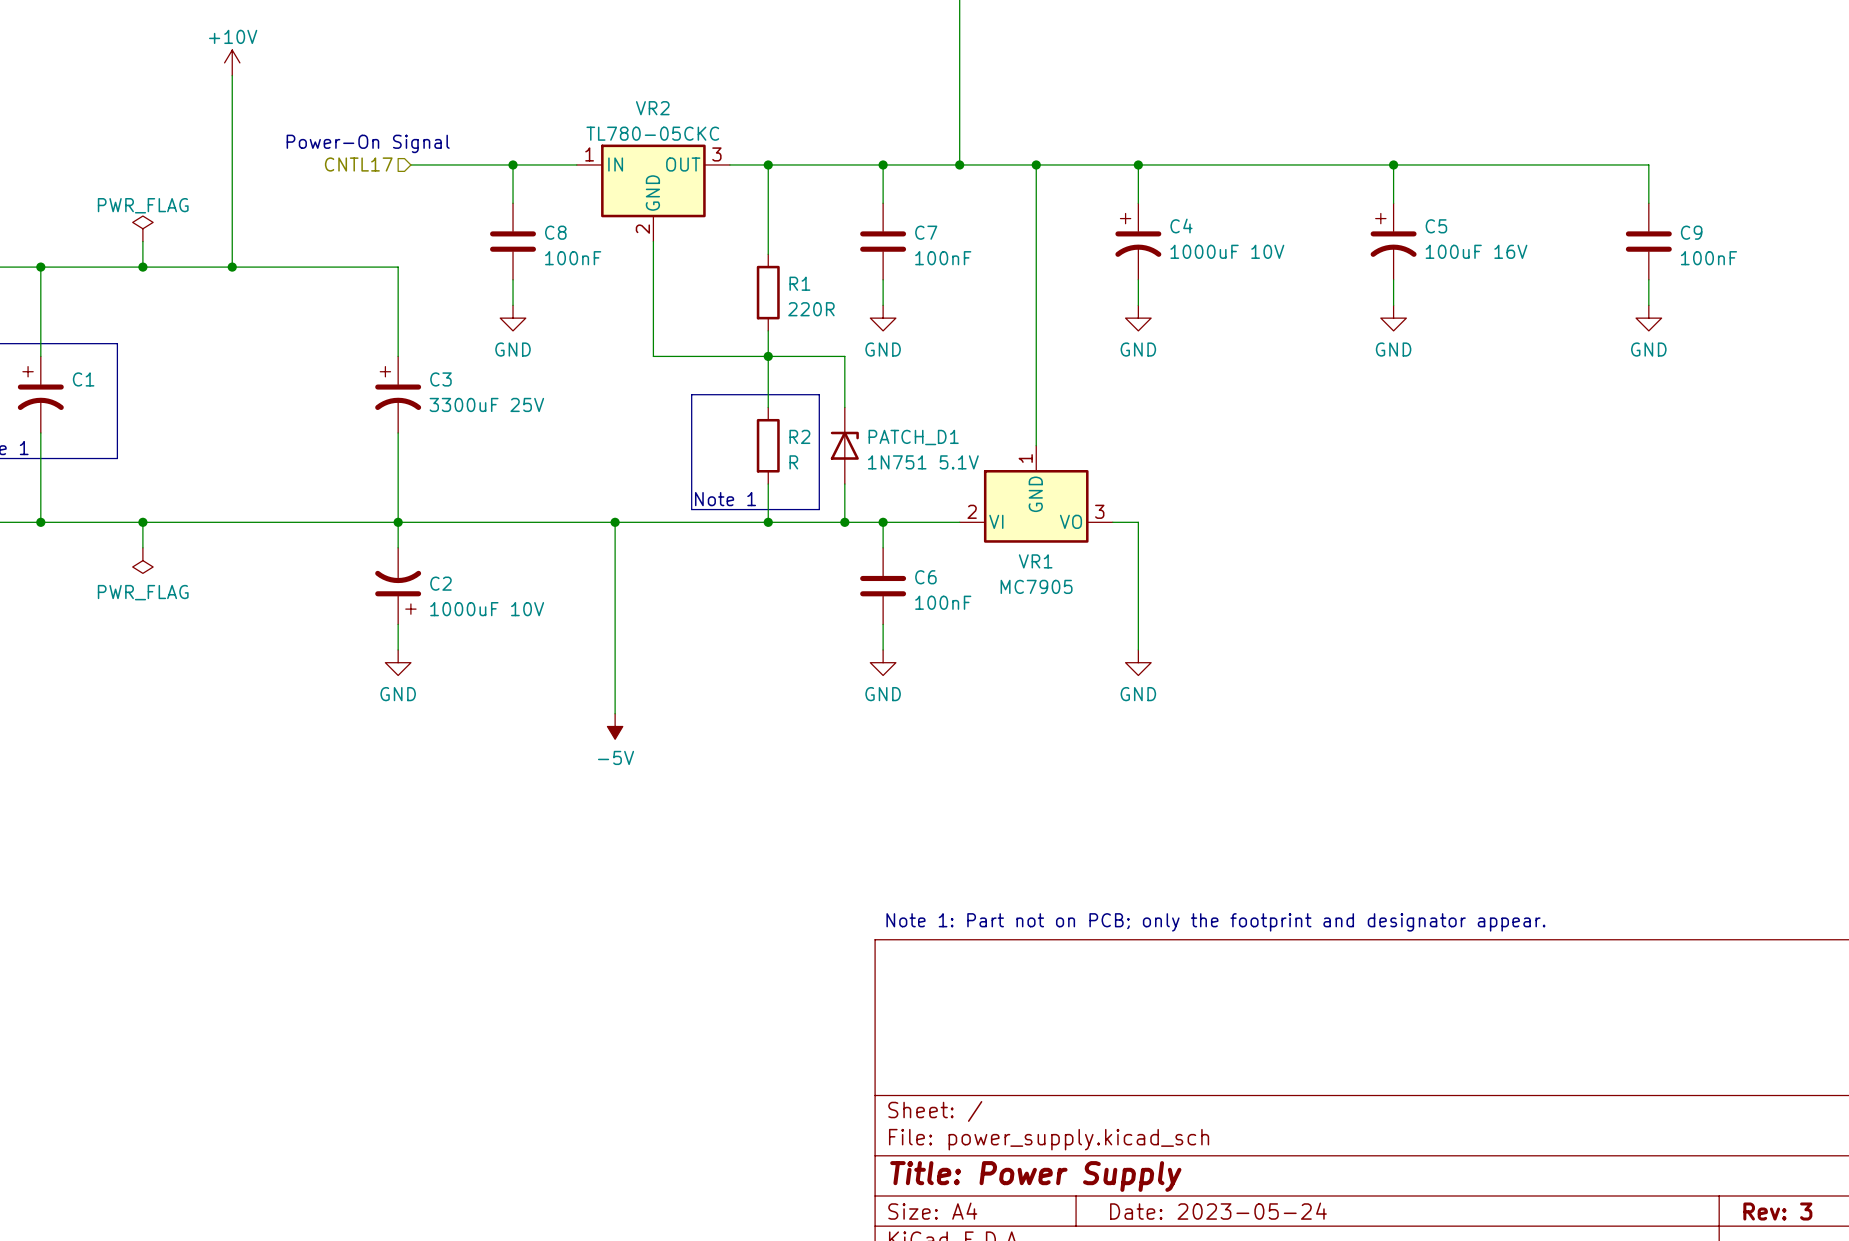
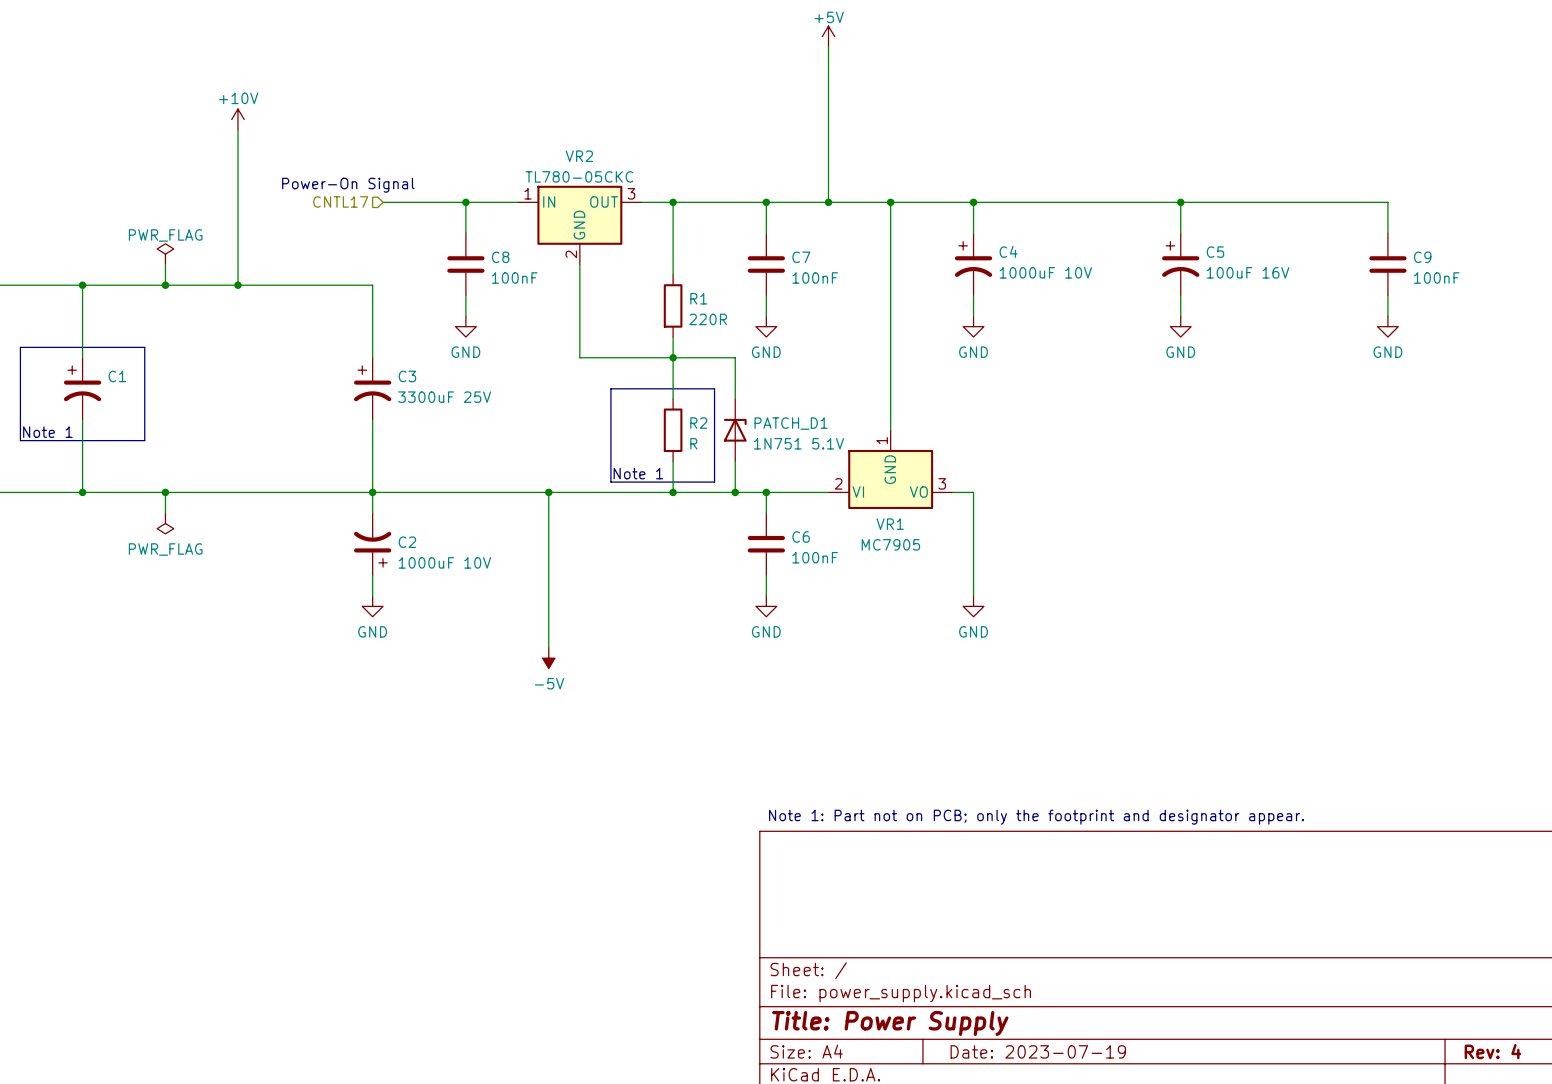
title block: Date: 2023-05-24 (1218, 1211) -> Date: 2023-07-19 (1038, 1051)
title block: Rev: 3 (1777, 1211) -> Rev: 4 (1492, 1051)

